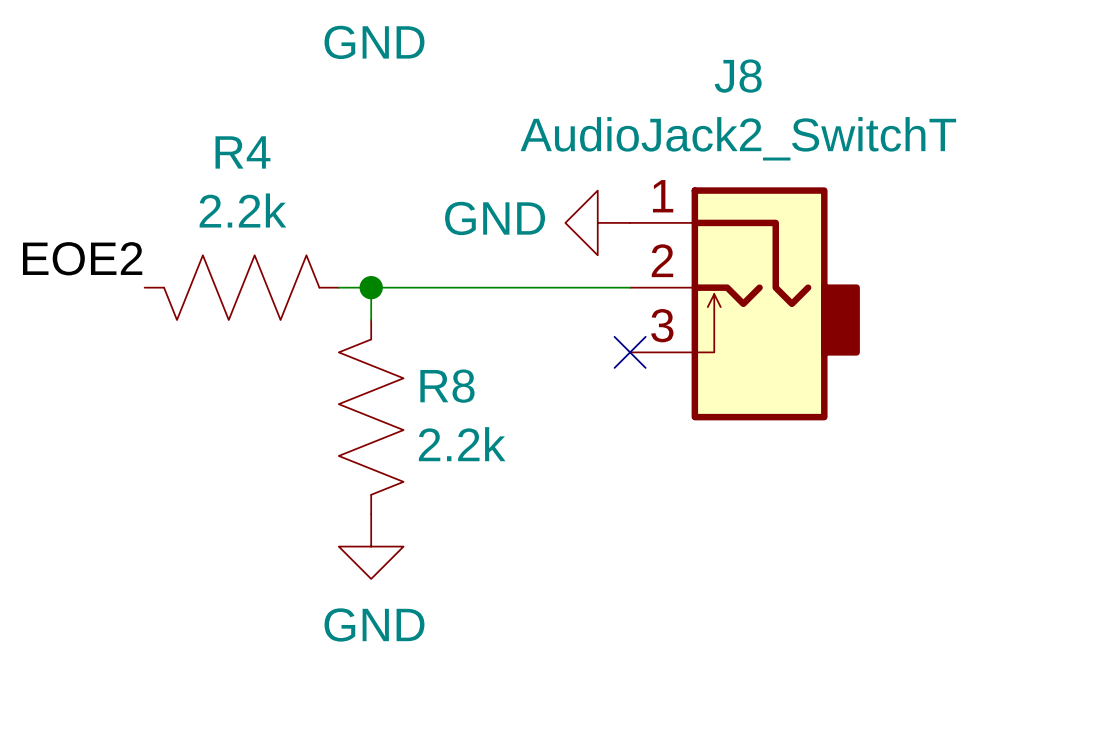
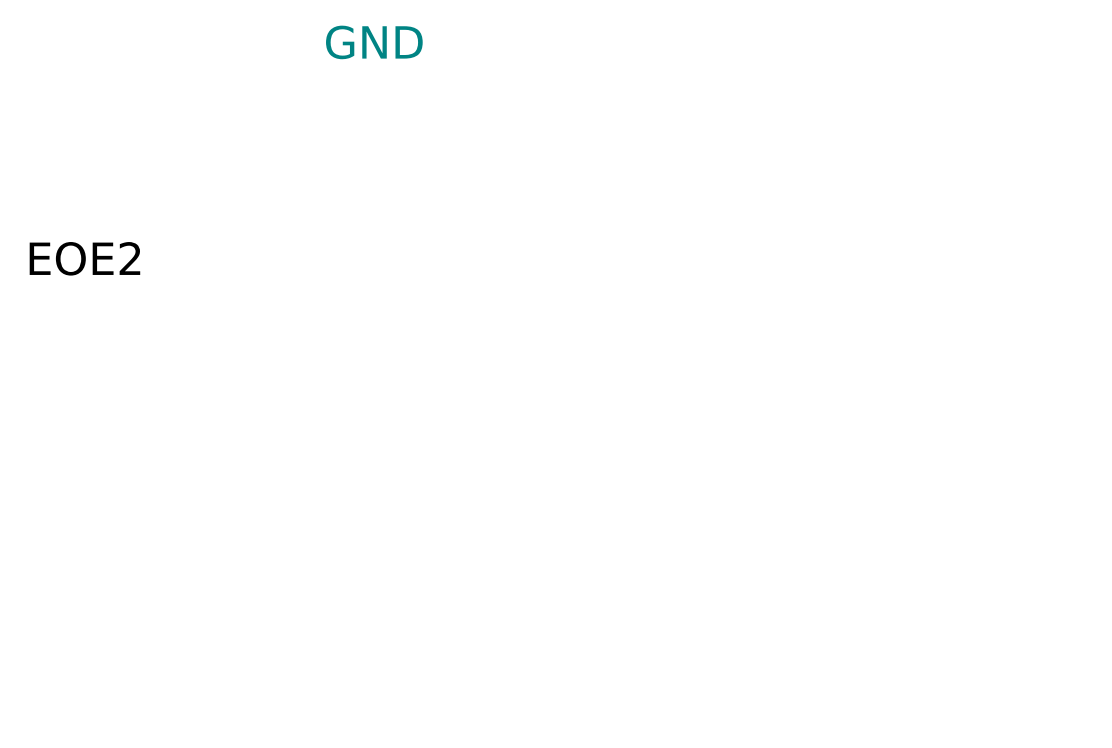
power symbol: GND (597, 222) -> none
R4: 2.2k (241, 287) -> none
wire: (338, 287) (630, 287) -> none
wire: (371, 287) (371, 320) -> none
junction: (371, 287) -> none
J8: AudioJack2_SwitchT (745, 303) -> none
no-connect mark: (630, 352) -> none
R8: 2.2k (371, 417) -> none
power symbol: GND (371, 546) -> none

